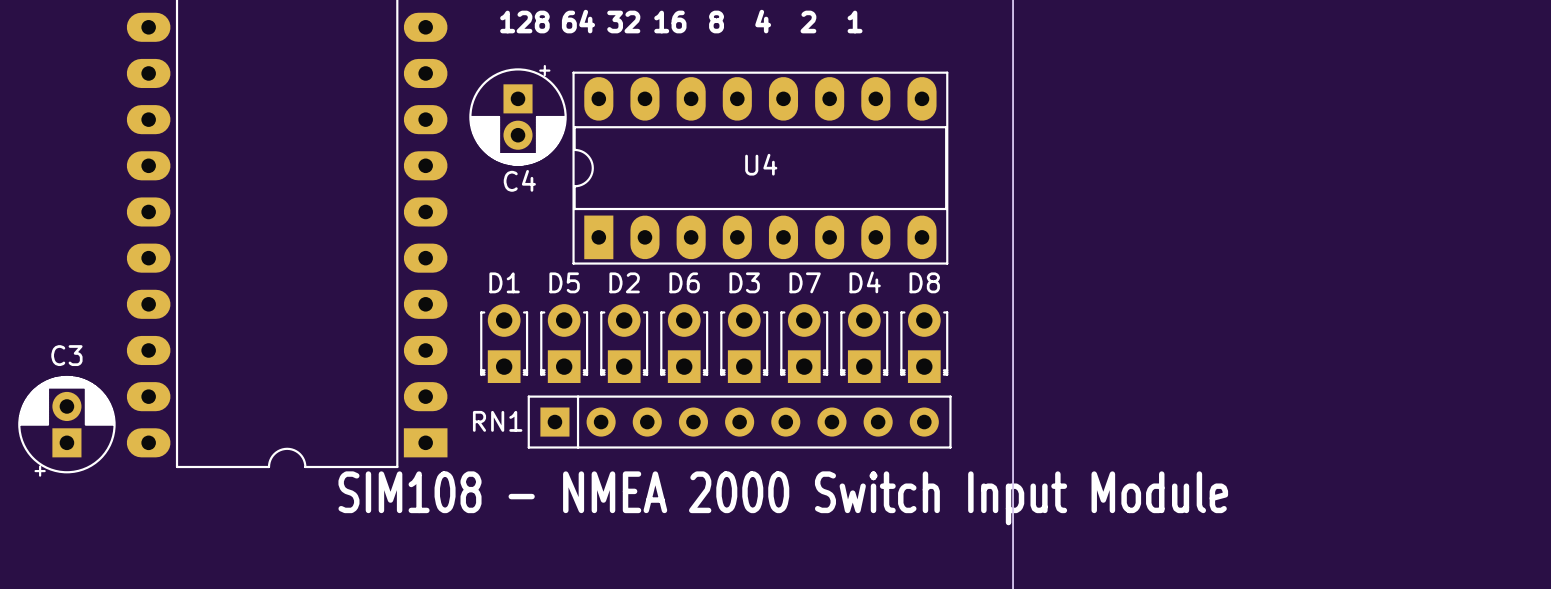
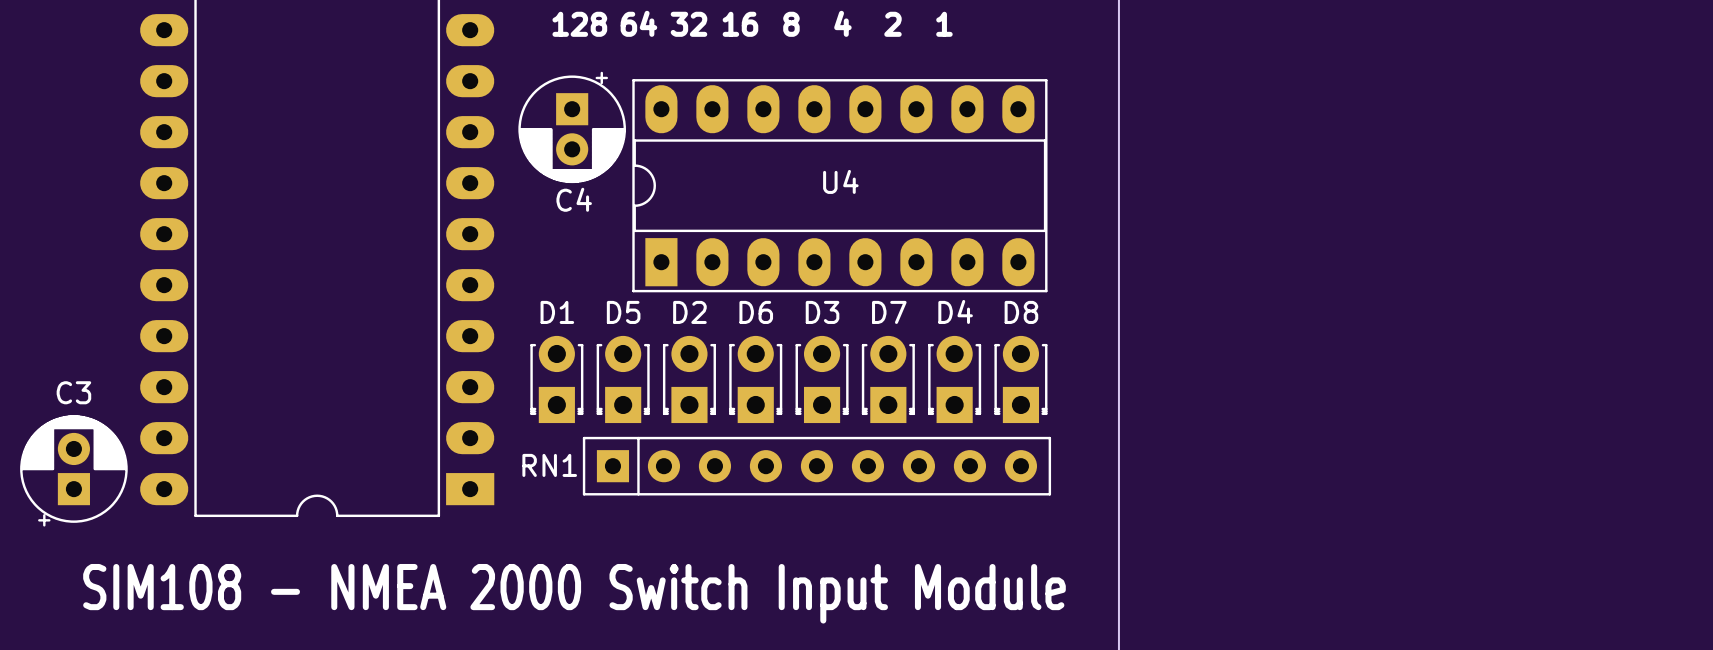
text position: SIM108 - NMEA 2000 Switch Input Module (783, 498) -> SIM108 - NMEA 2000 Switch Input Module (574, 593)

